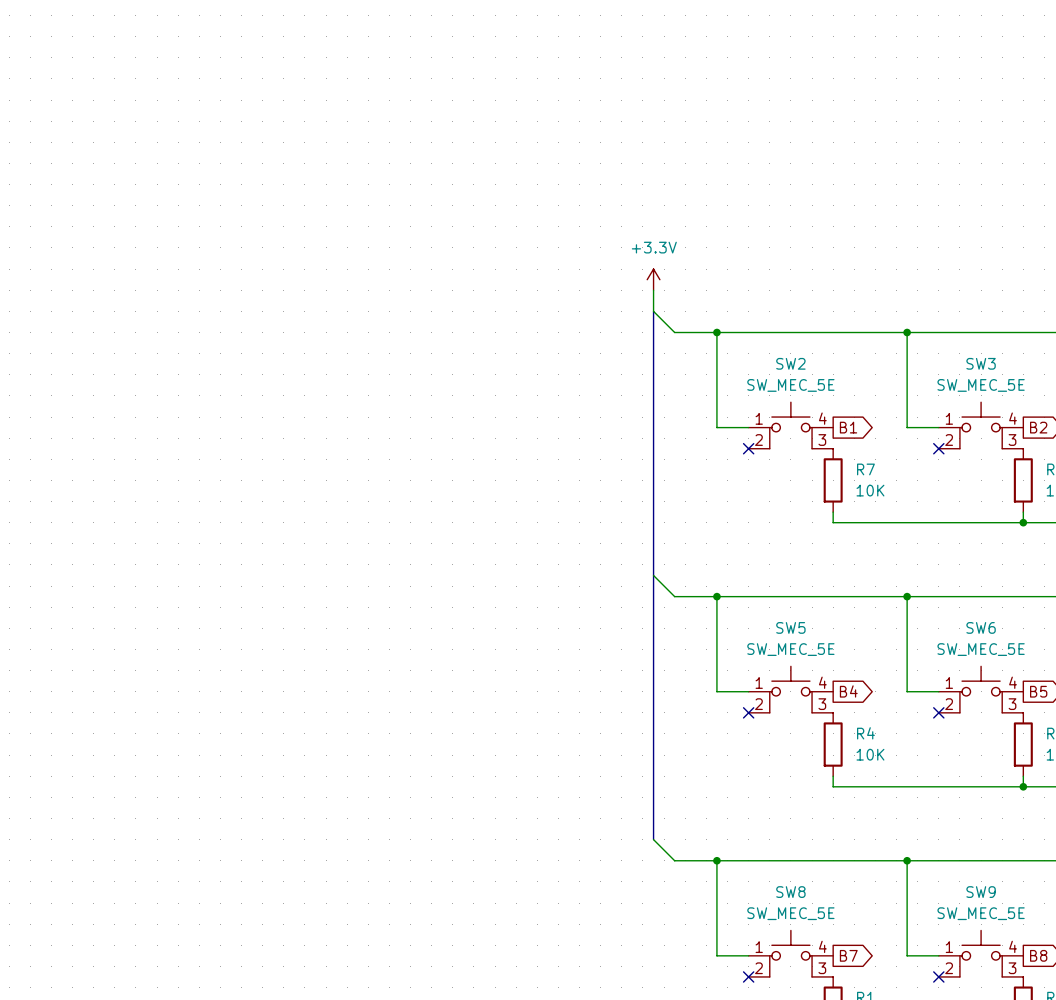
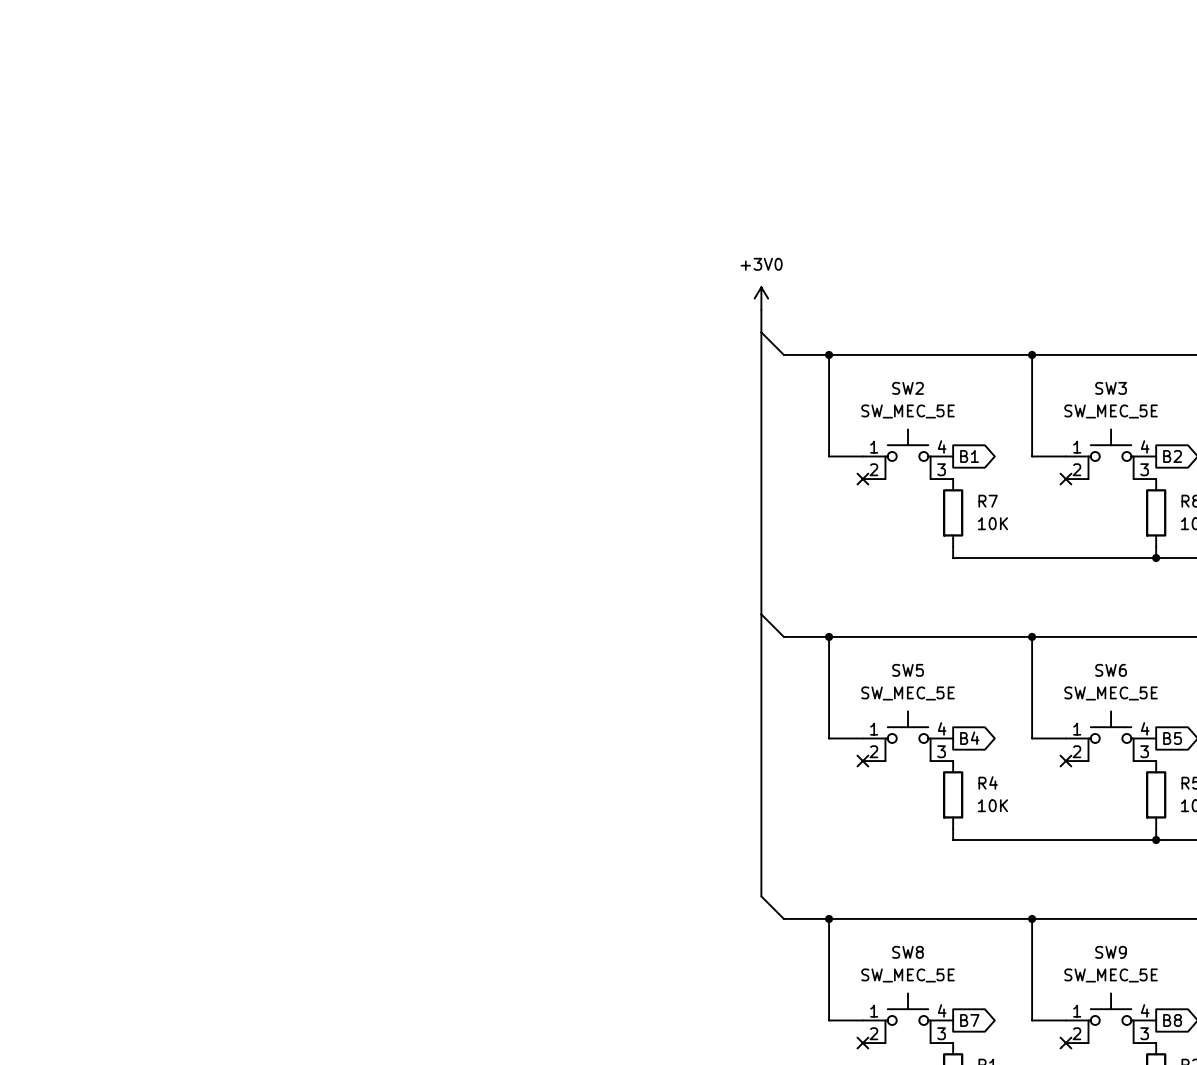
power symbol: +3.3V (653, 279) -> +3V0 (761, 298)

